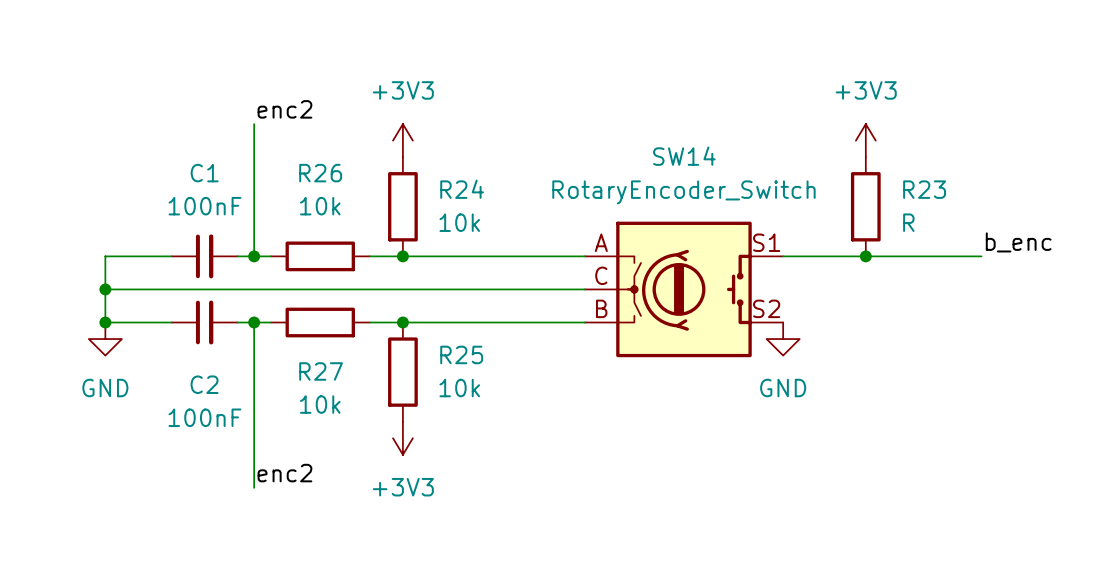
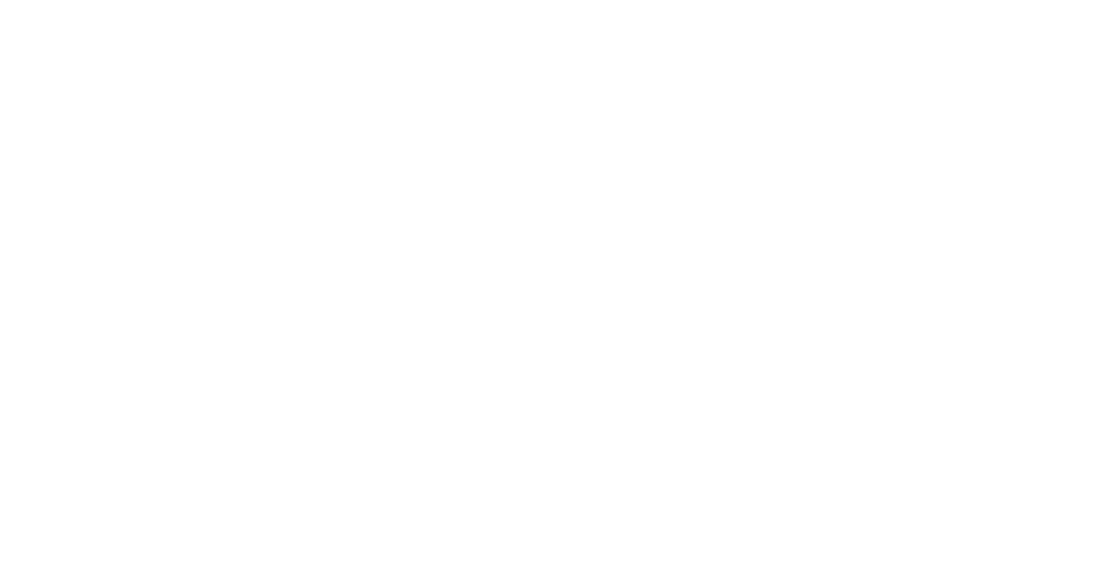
label: enc2 (284, 109) -> none
wire: (254, 124) (254, 256) -> none
power symbol: +3V3 (402, 140) -> none
power symbol: +3V3 (865, 140) -> none
R24: 10k (402, 206) -> none
R23: R (865, 206) -> none
label: b_enc (1018, 242) -> none
wire: (171, 256) (105, 256) (105, 322) (171, 322) -> none
C1: 100nF (204, 256) -> none
wire: (237, 256) (270, 256) -> none
junction: (254, 256) -> none
R26: 10k (320, 256) -> none
wire: (369, 256) (584, 256) -> none
junction: (402, 256) -> none
wire: (783, 256) (981, 256) -> none
junction: (865, 256) -> none
wire: (105, 289) (584, 289) -> none
junction: (105, 289) -> none
SW14: RotaryEncoder_Switch (683, 289) -> none
junction: (105, 322) -> none
C2: 100nF (204, 322) -> none
wire: (237, 322) (270, 322) -> none
wire: (254, 322) (254, 487) -> none
junction: (254, 322) -> none
R27: 10k (320, 322) -> none
wire: (369, 322) (584, 322) -> none
junction: (402, 322) -> none
power symbol: GND (105, 339) -> none
power symbol: GND (783, 339) -> none
R25: 10k (402, 372) -> none
power symbol: +3V3 (402, 438) -> none
label: enc2 (284, 473) -> none

